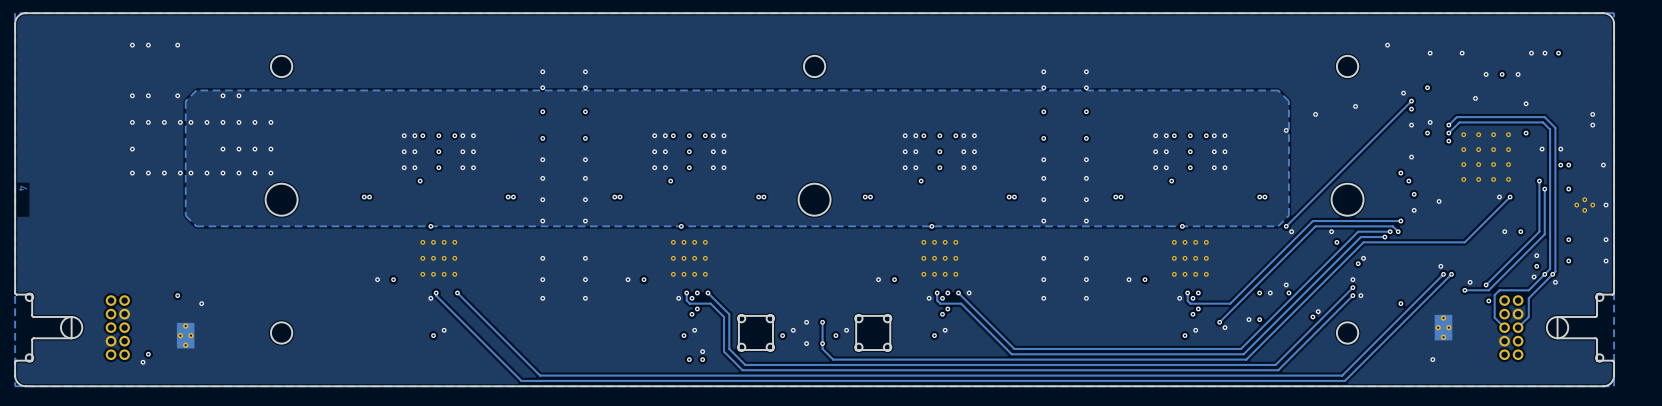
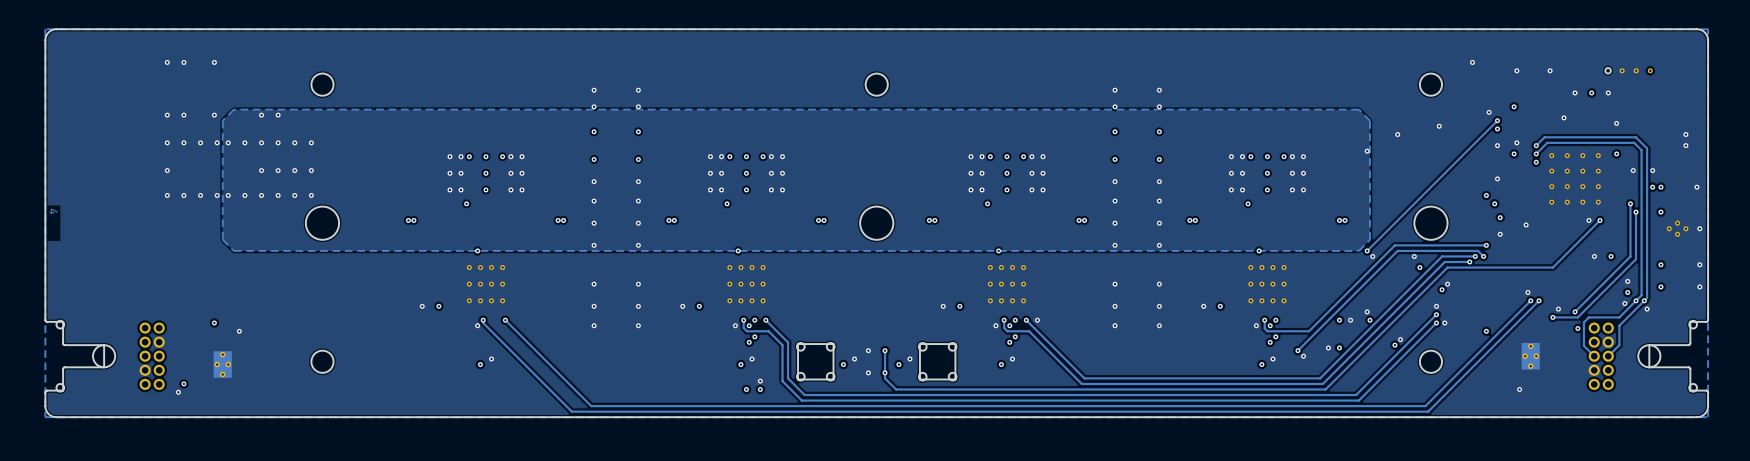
via: (1531, 53) -> none
part: none -> (1629, 70)
via: (1544, 53) -> none
via: (1558, 53) -> none

